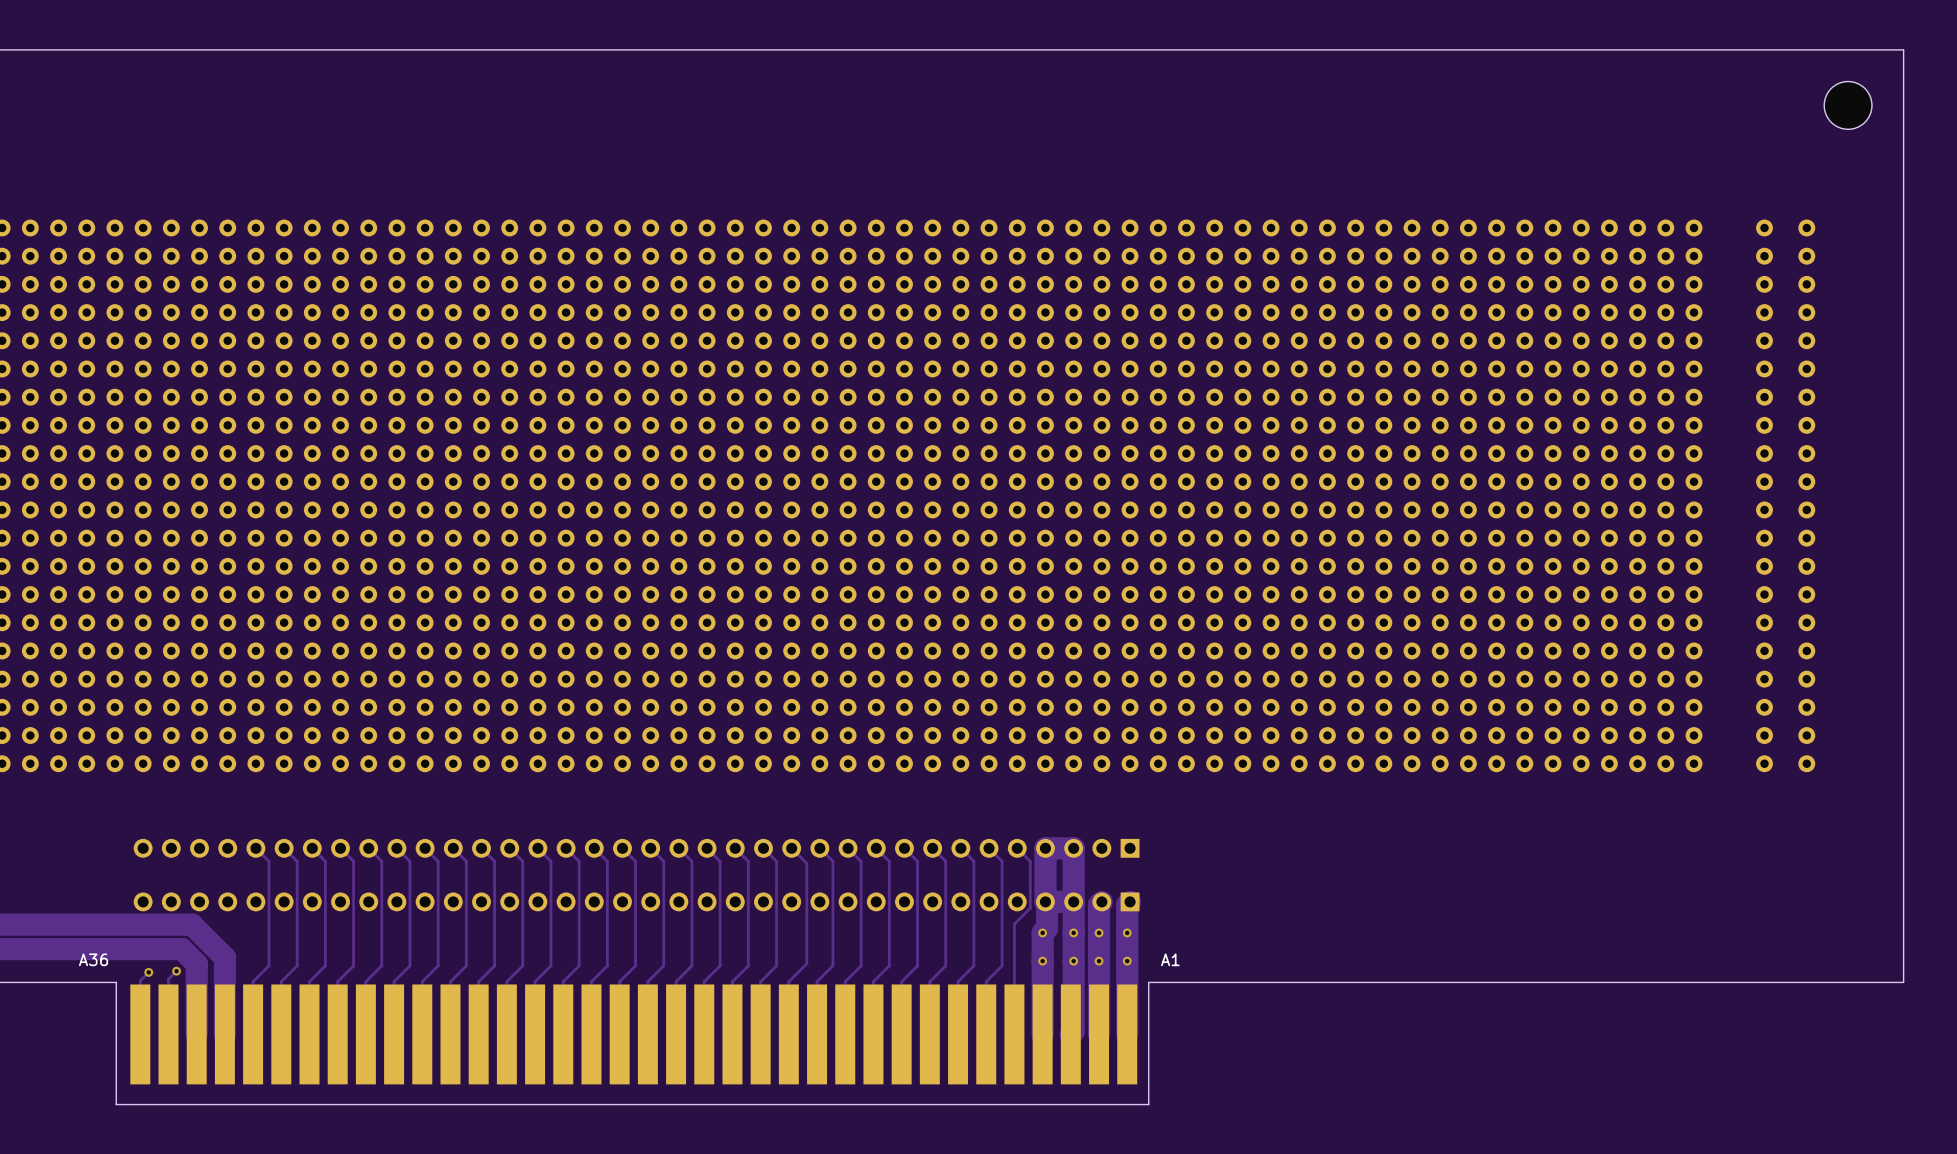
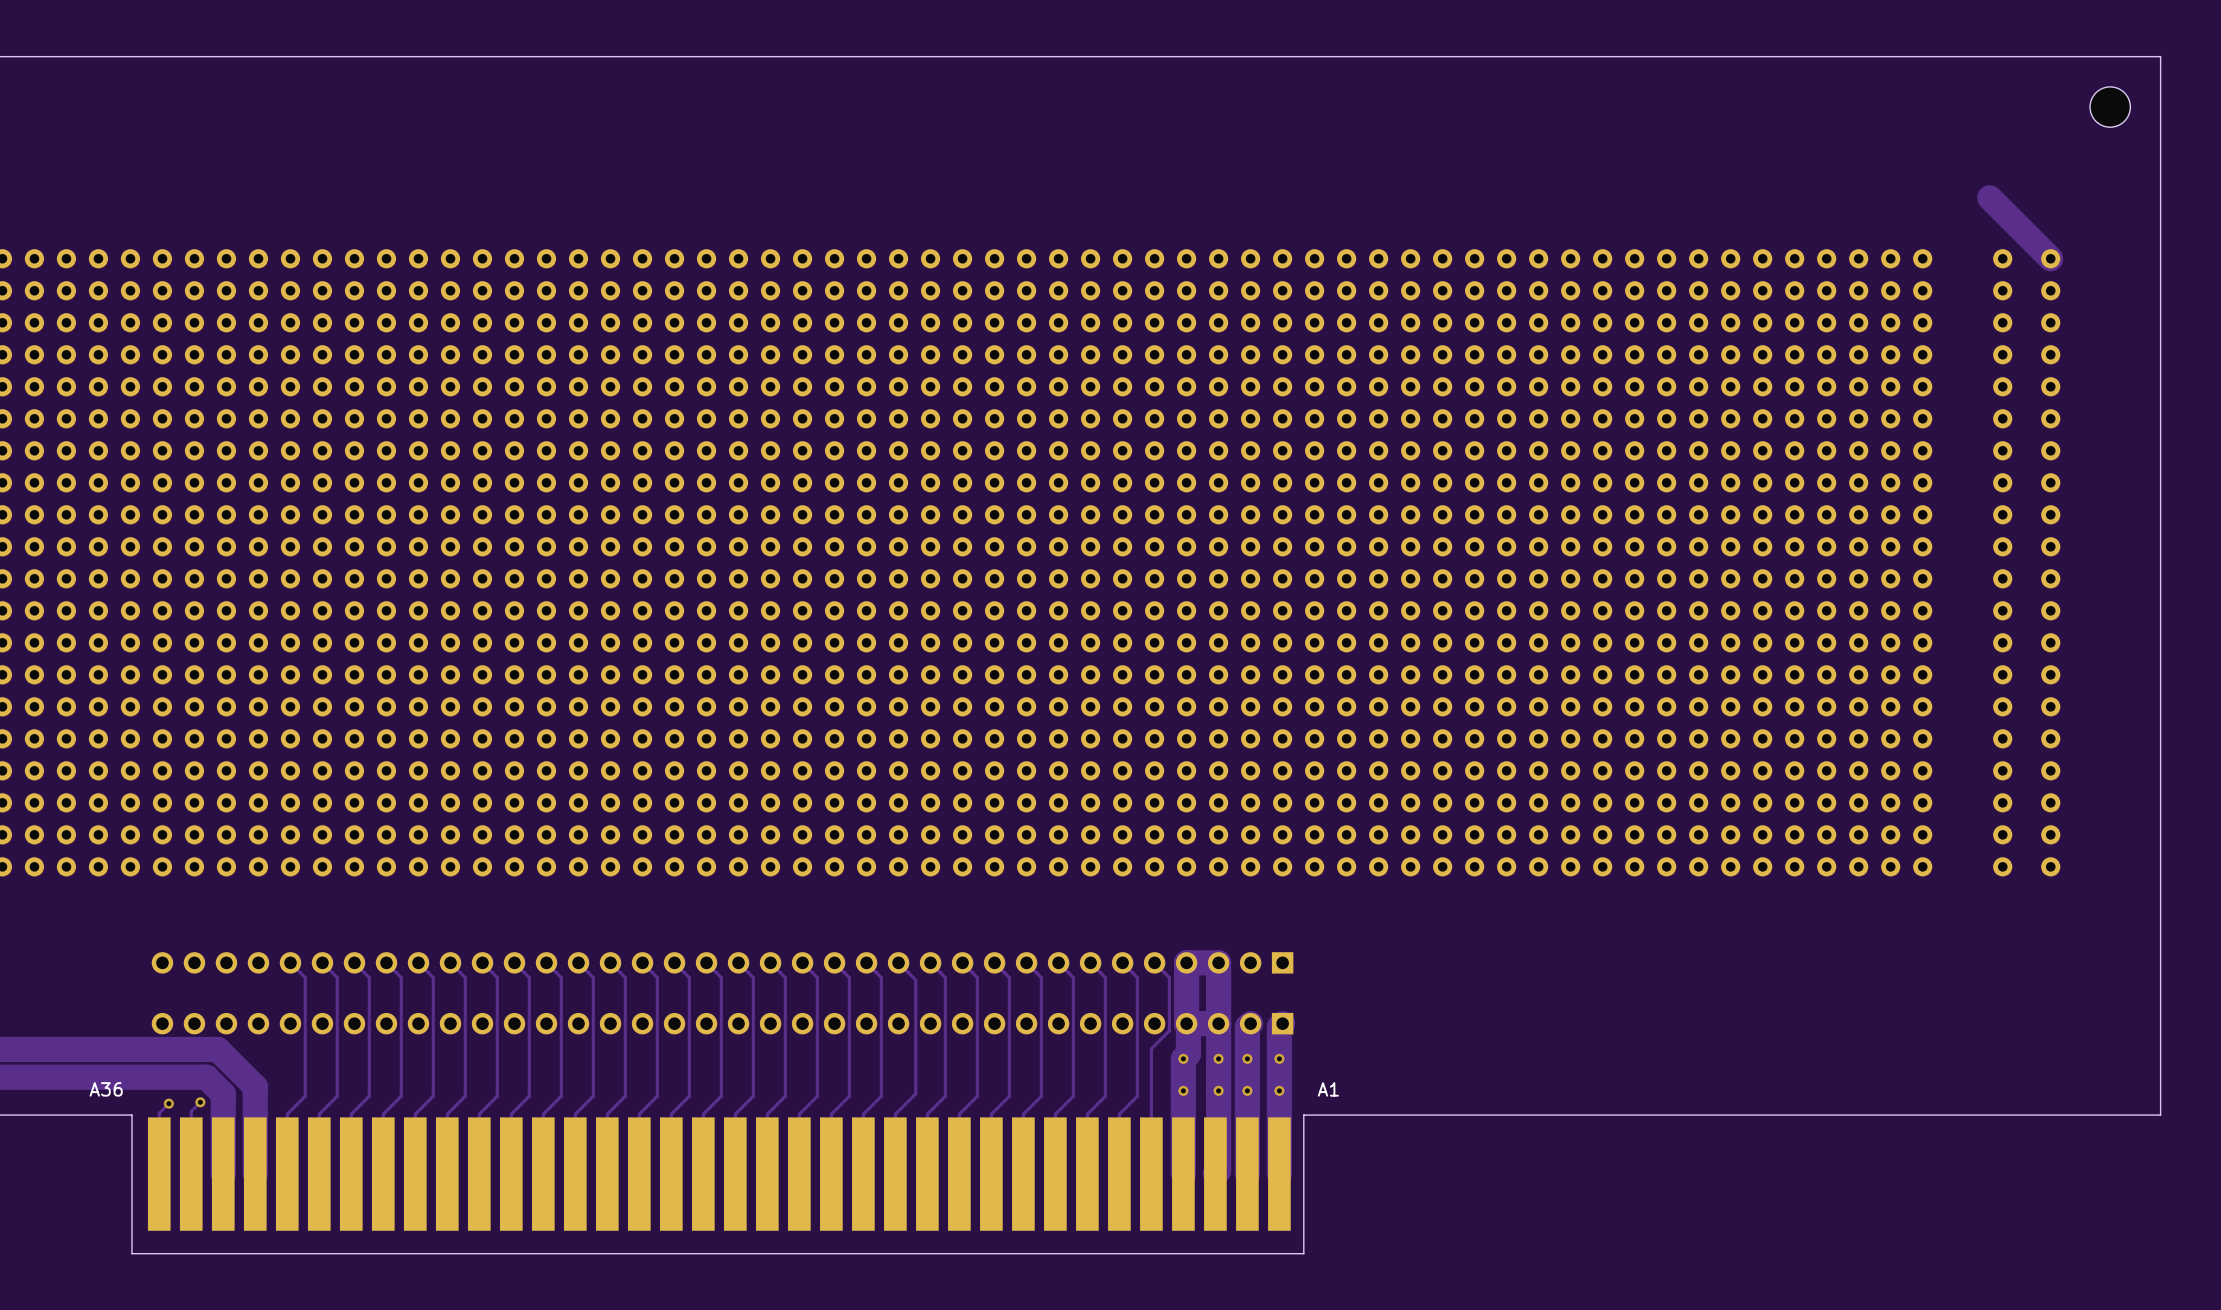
part: none -> (2110, 107)
part: (1848, 105) -> none
track: none -> (1989, 197) (2050, 258)

